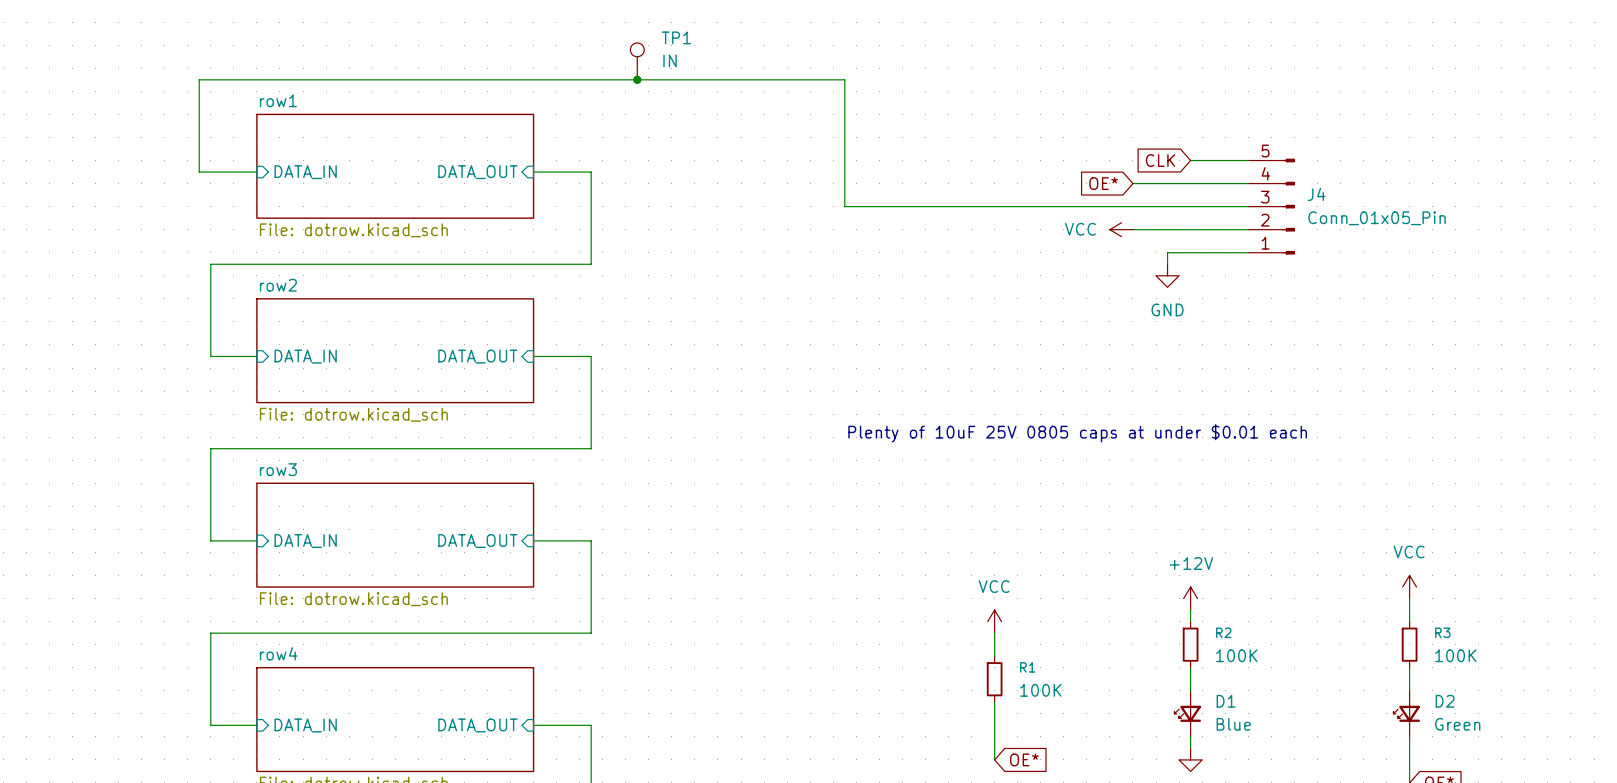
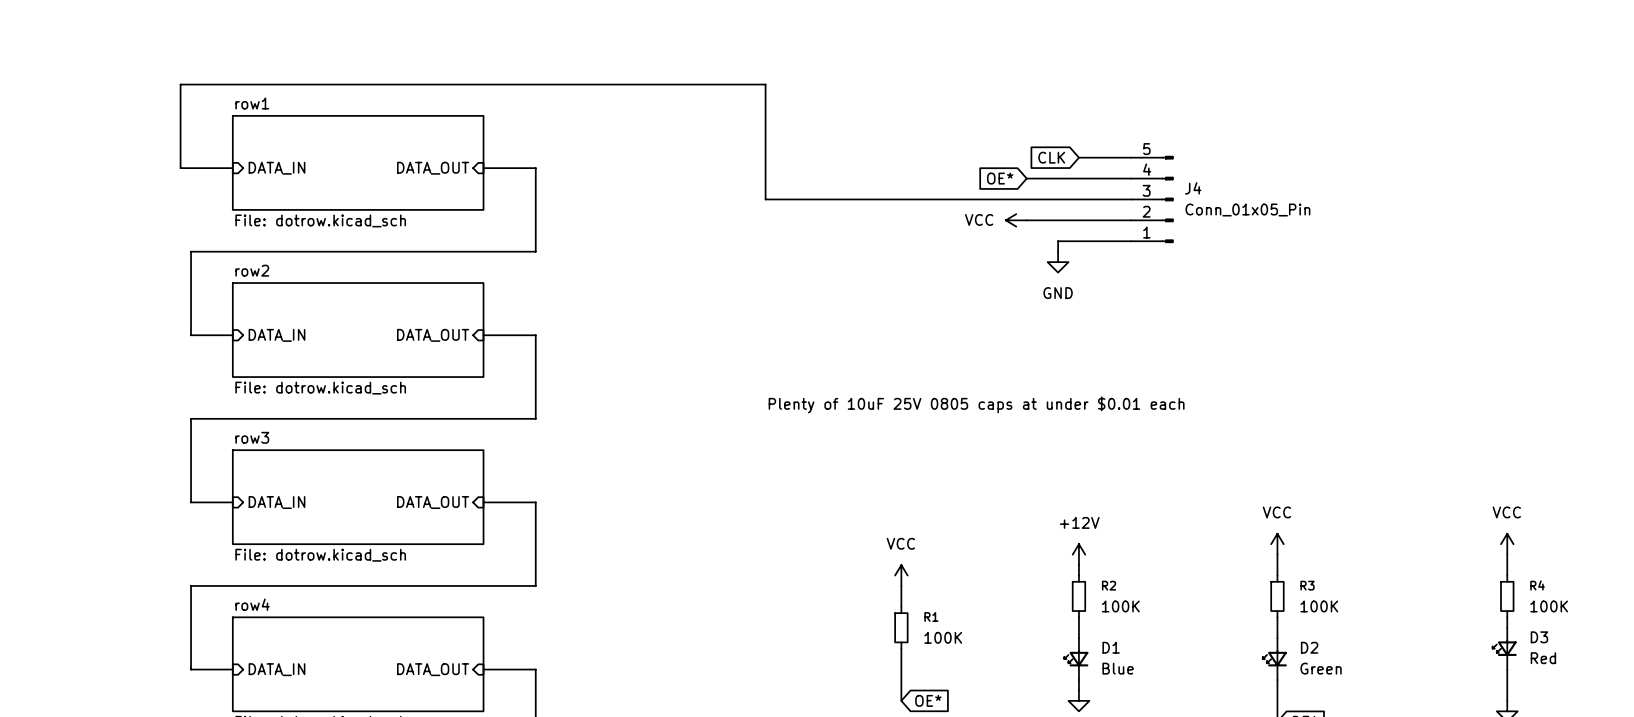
TP1: IN (637, 61) -> none
junction: (637, 79) -> none

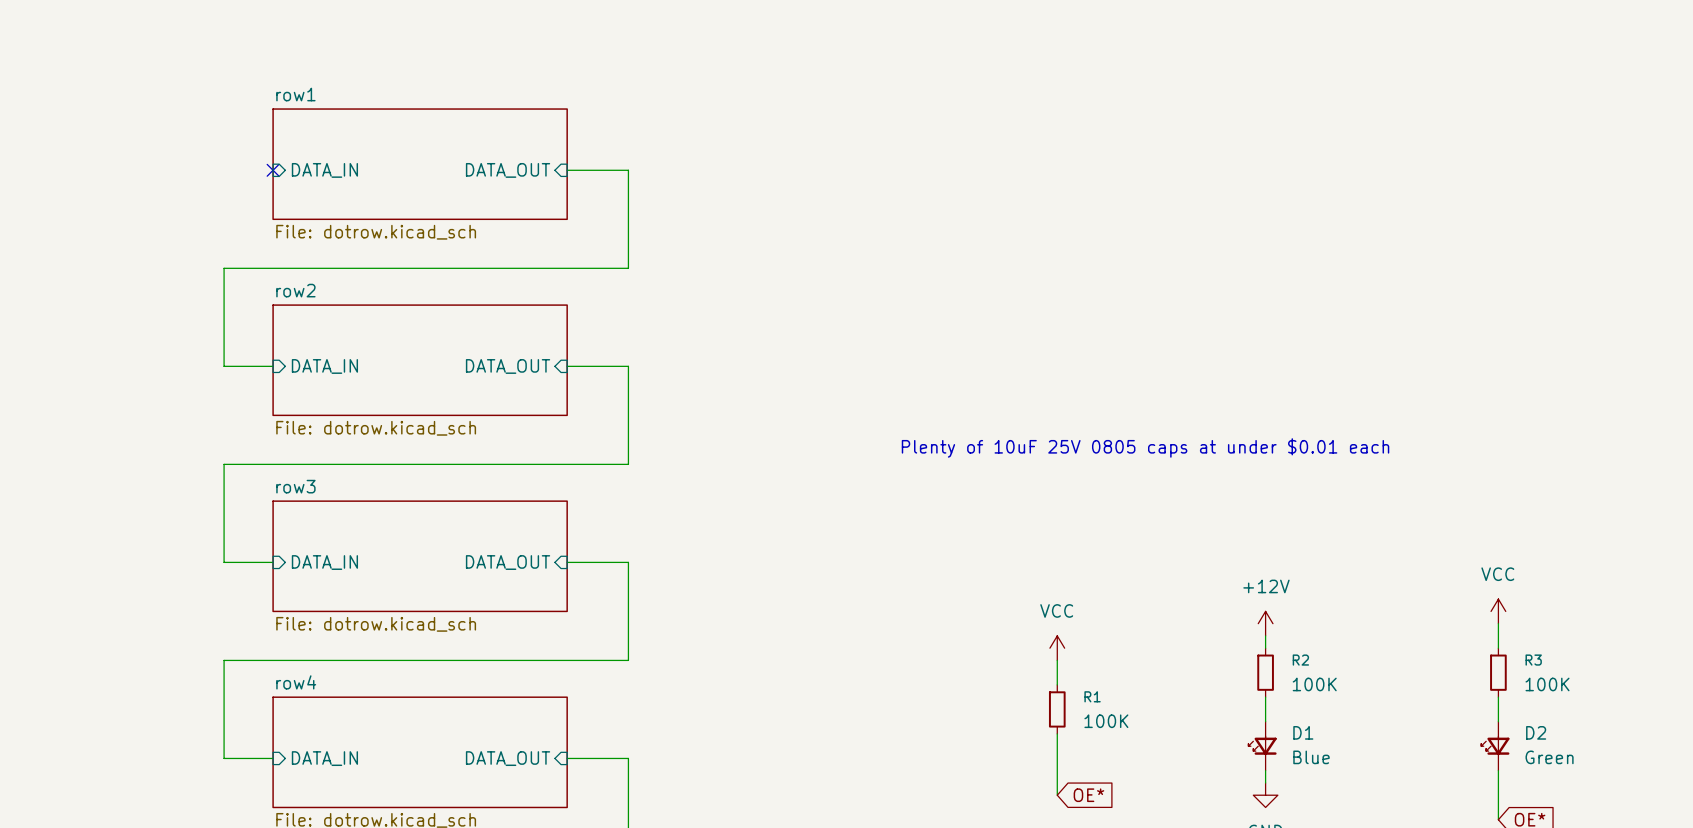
global label: CLK (1051, 157) -> none
wire: (1078, 157) (1131, 157) -> none
wire: (232, 168) (180, 168) (180, 84) (765, 84) (765, 199) (1131, 199) -> none
no-connect mark: none -> (273, 170)
global label: OE* (1000, 178) -> none
wire: (1026, 178) (1131, 178) -> none
J4: Conn_01x05_Pin (1152, 199) -> none
power symbol: VCC (1016, 220) -> none
wire: (1026, 220) (1131, 220) -> none
wire: (1131, 241) (1058, 241) (1058, 251) -> none
power symbol: GND (1058, 262) -> none

